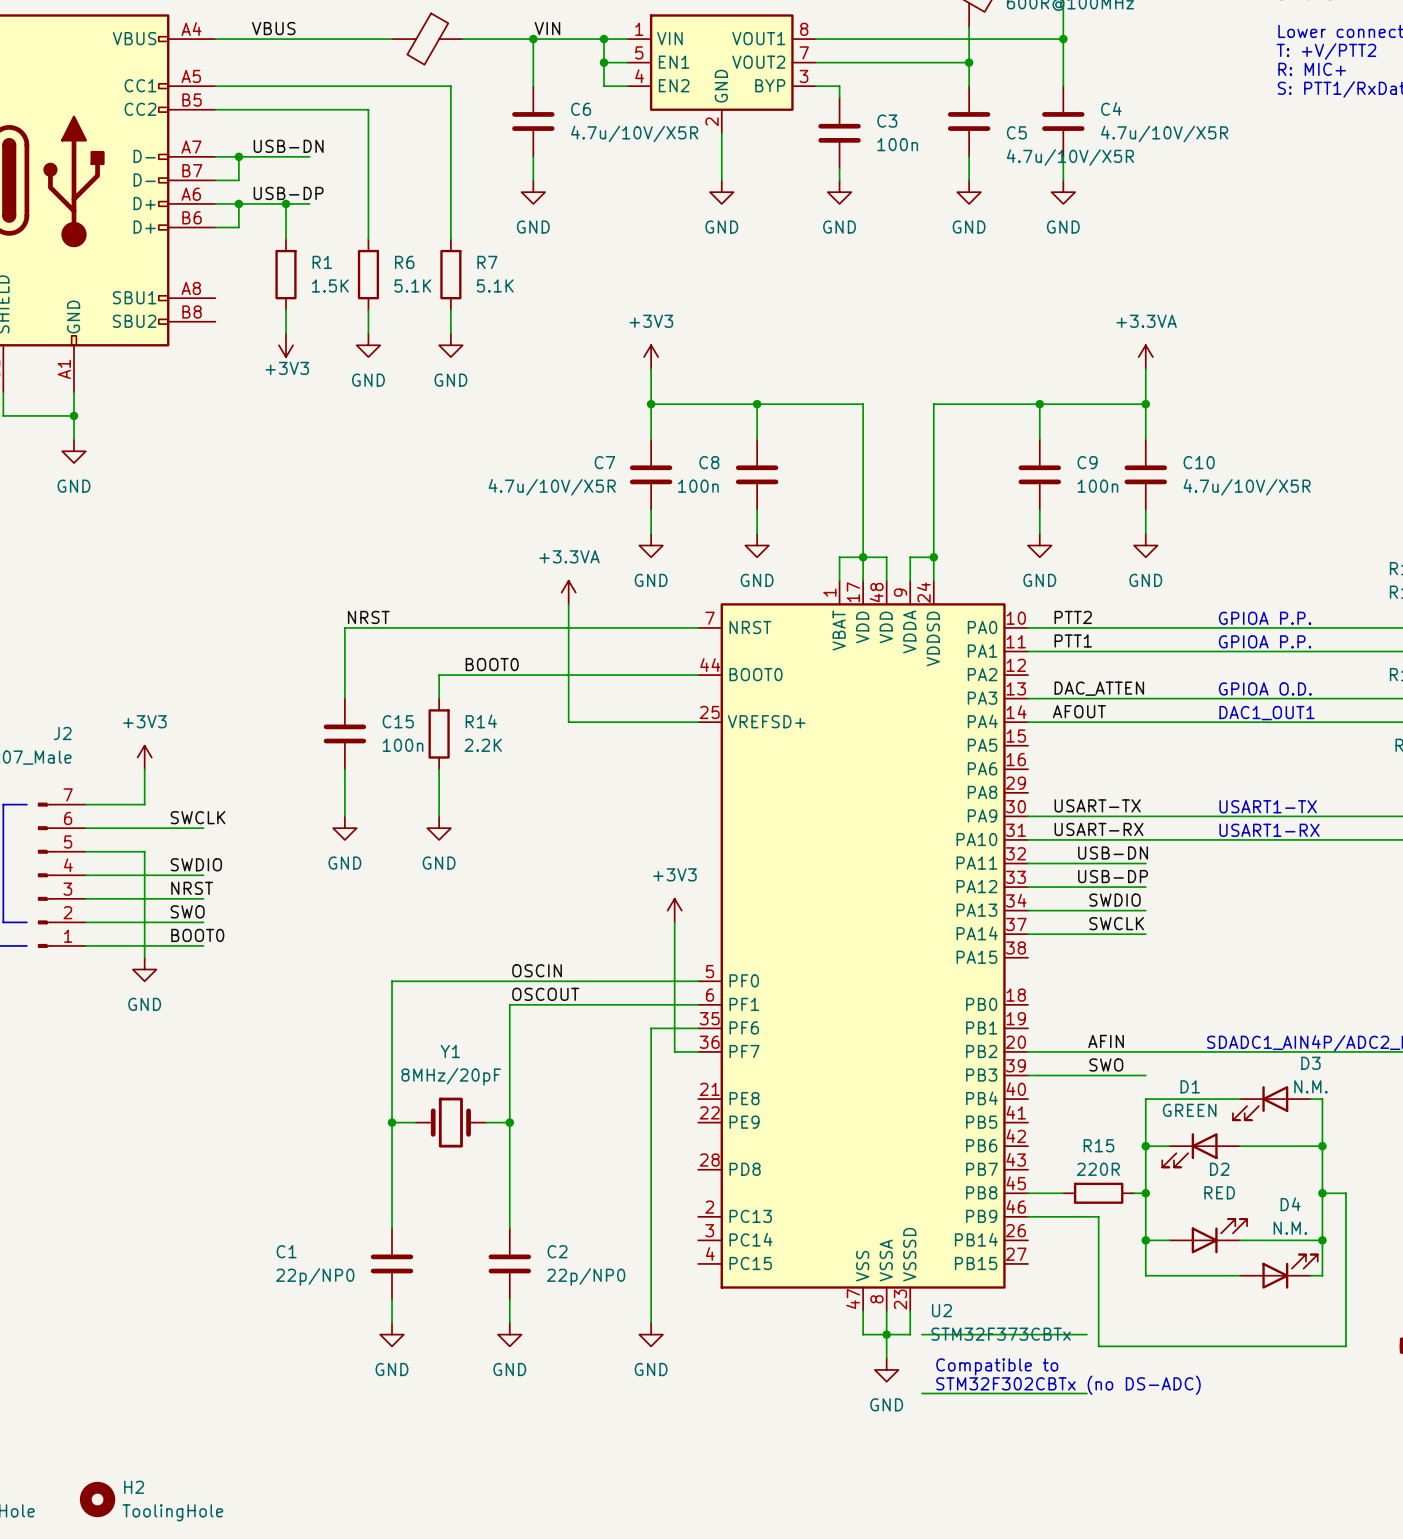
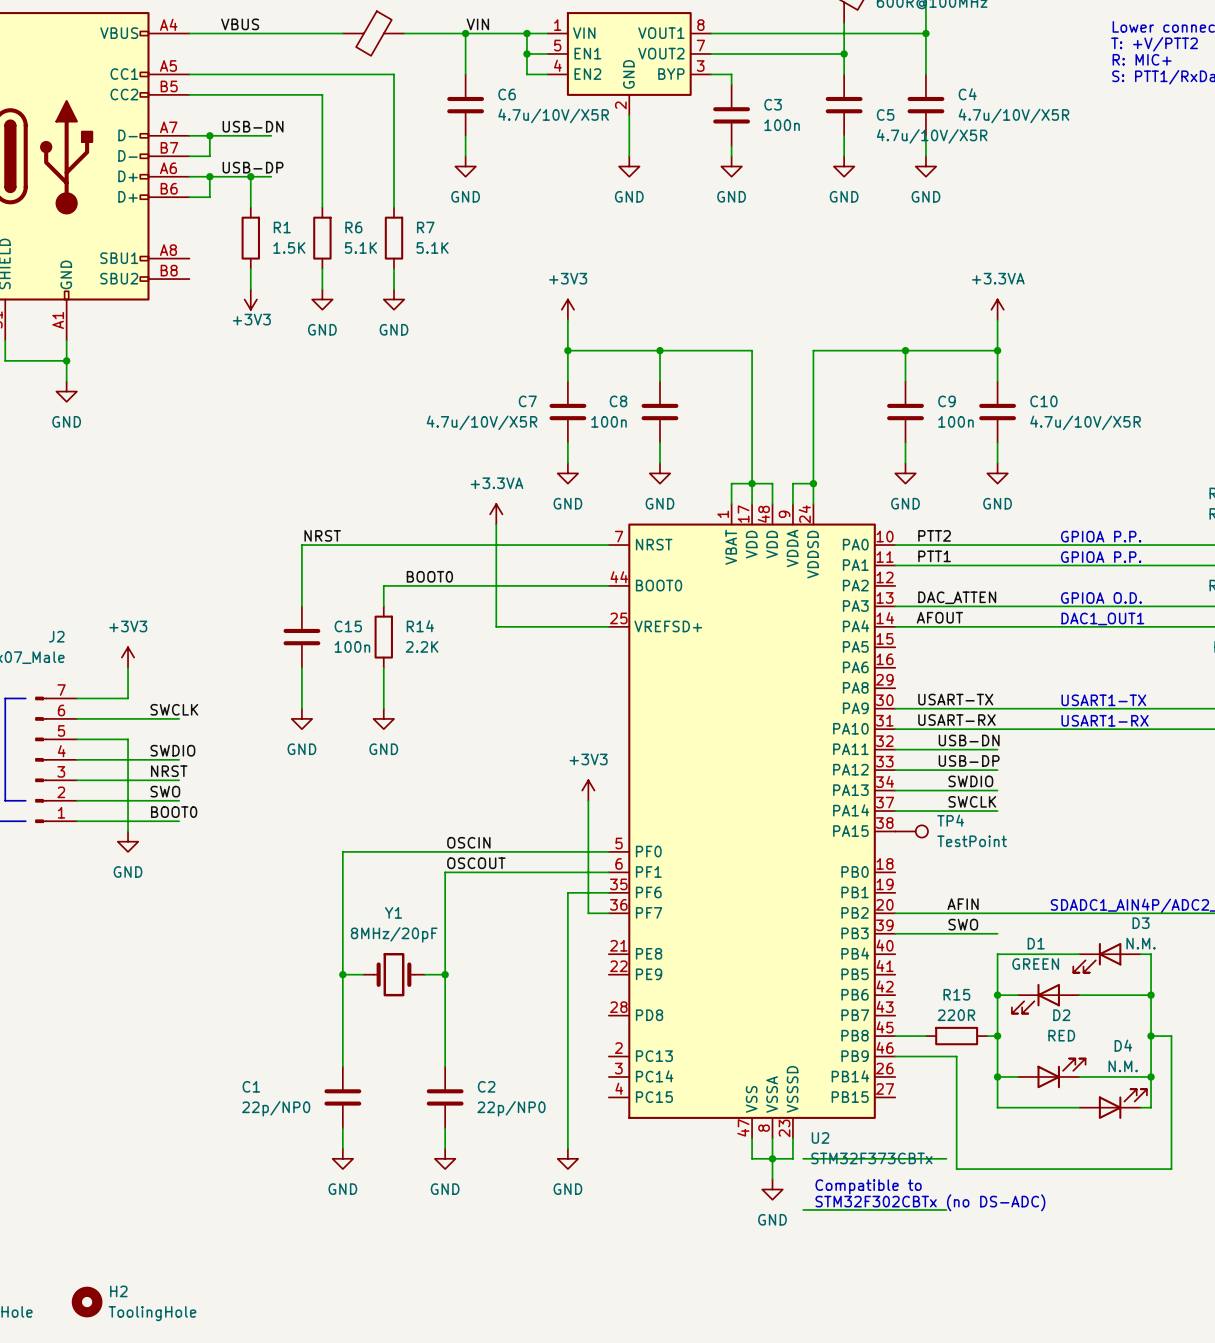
TP4: none -> TestPoint (911, 831)

